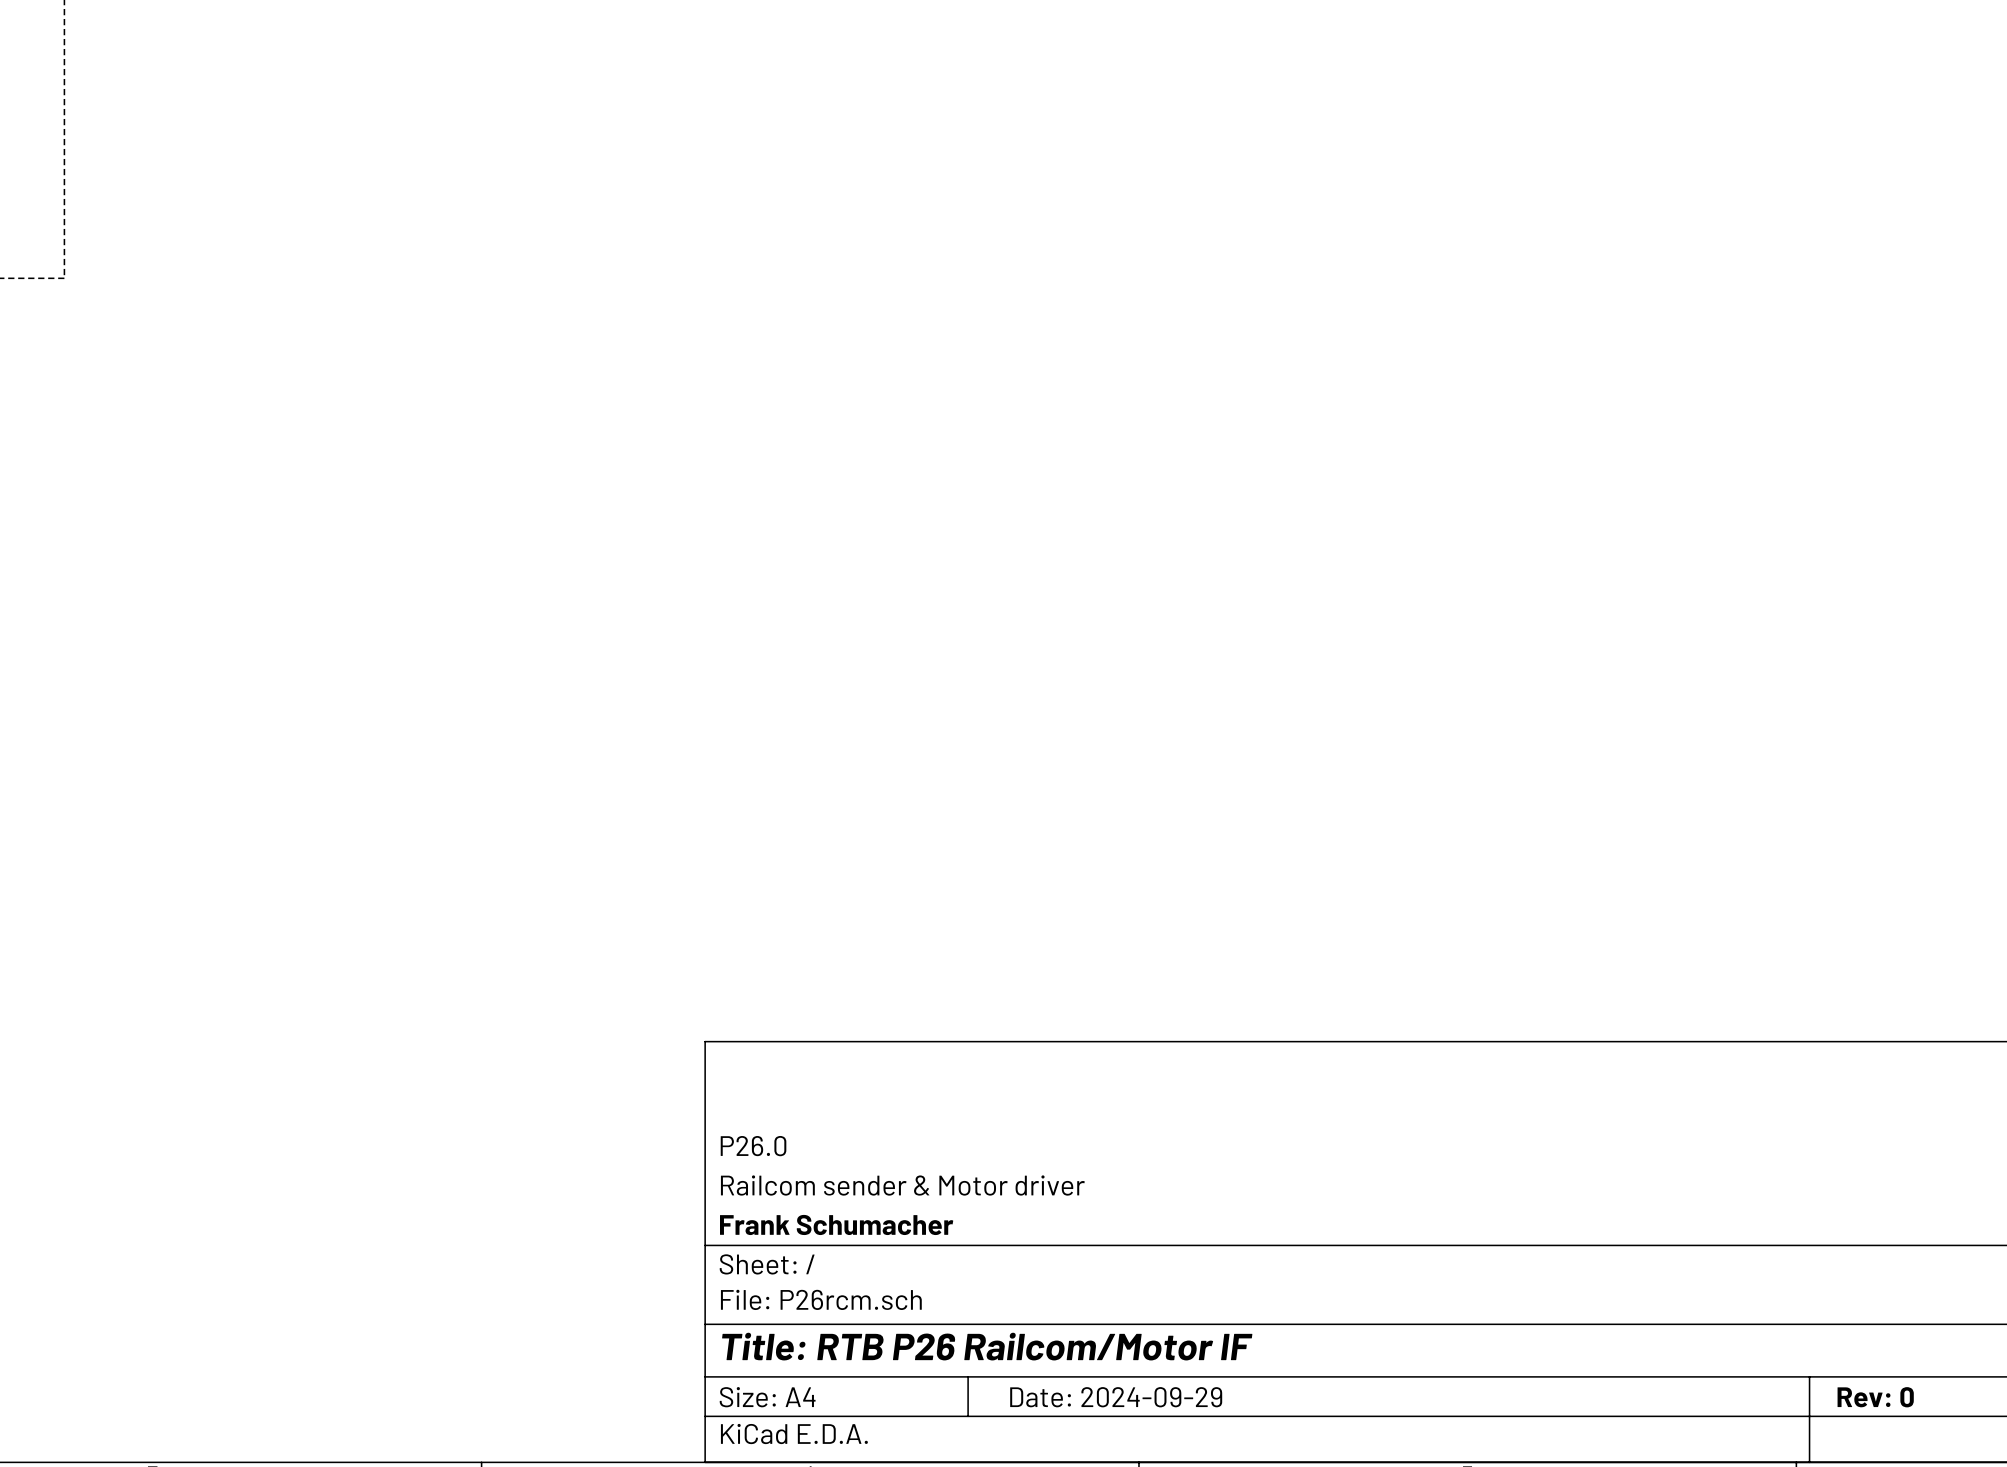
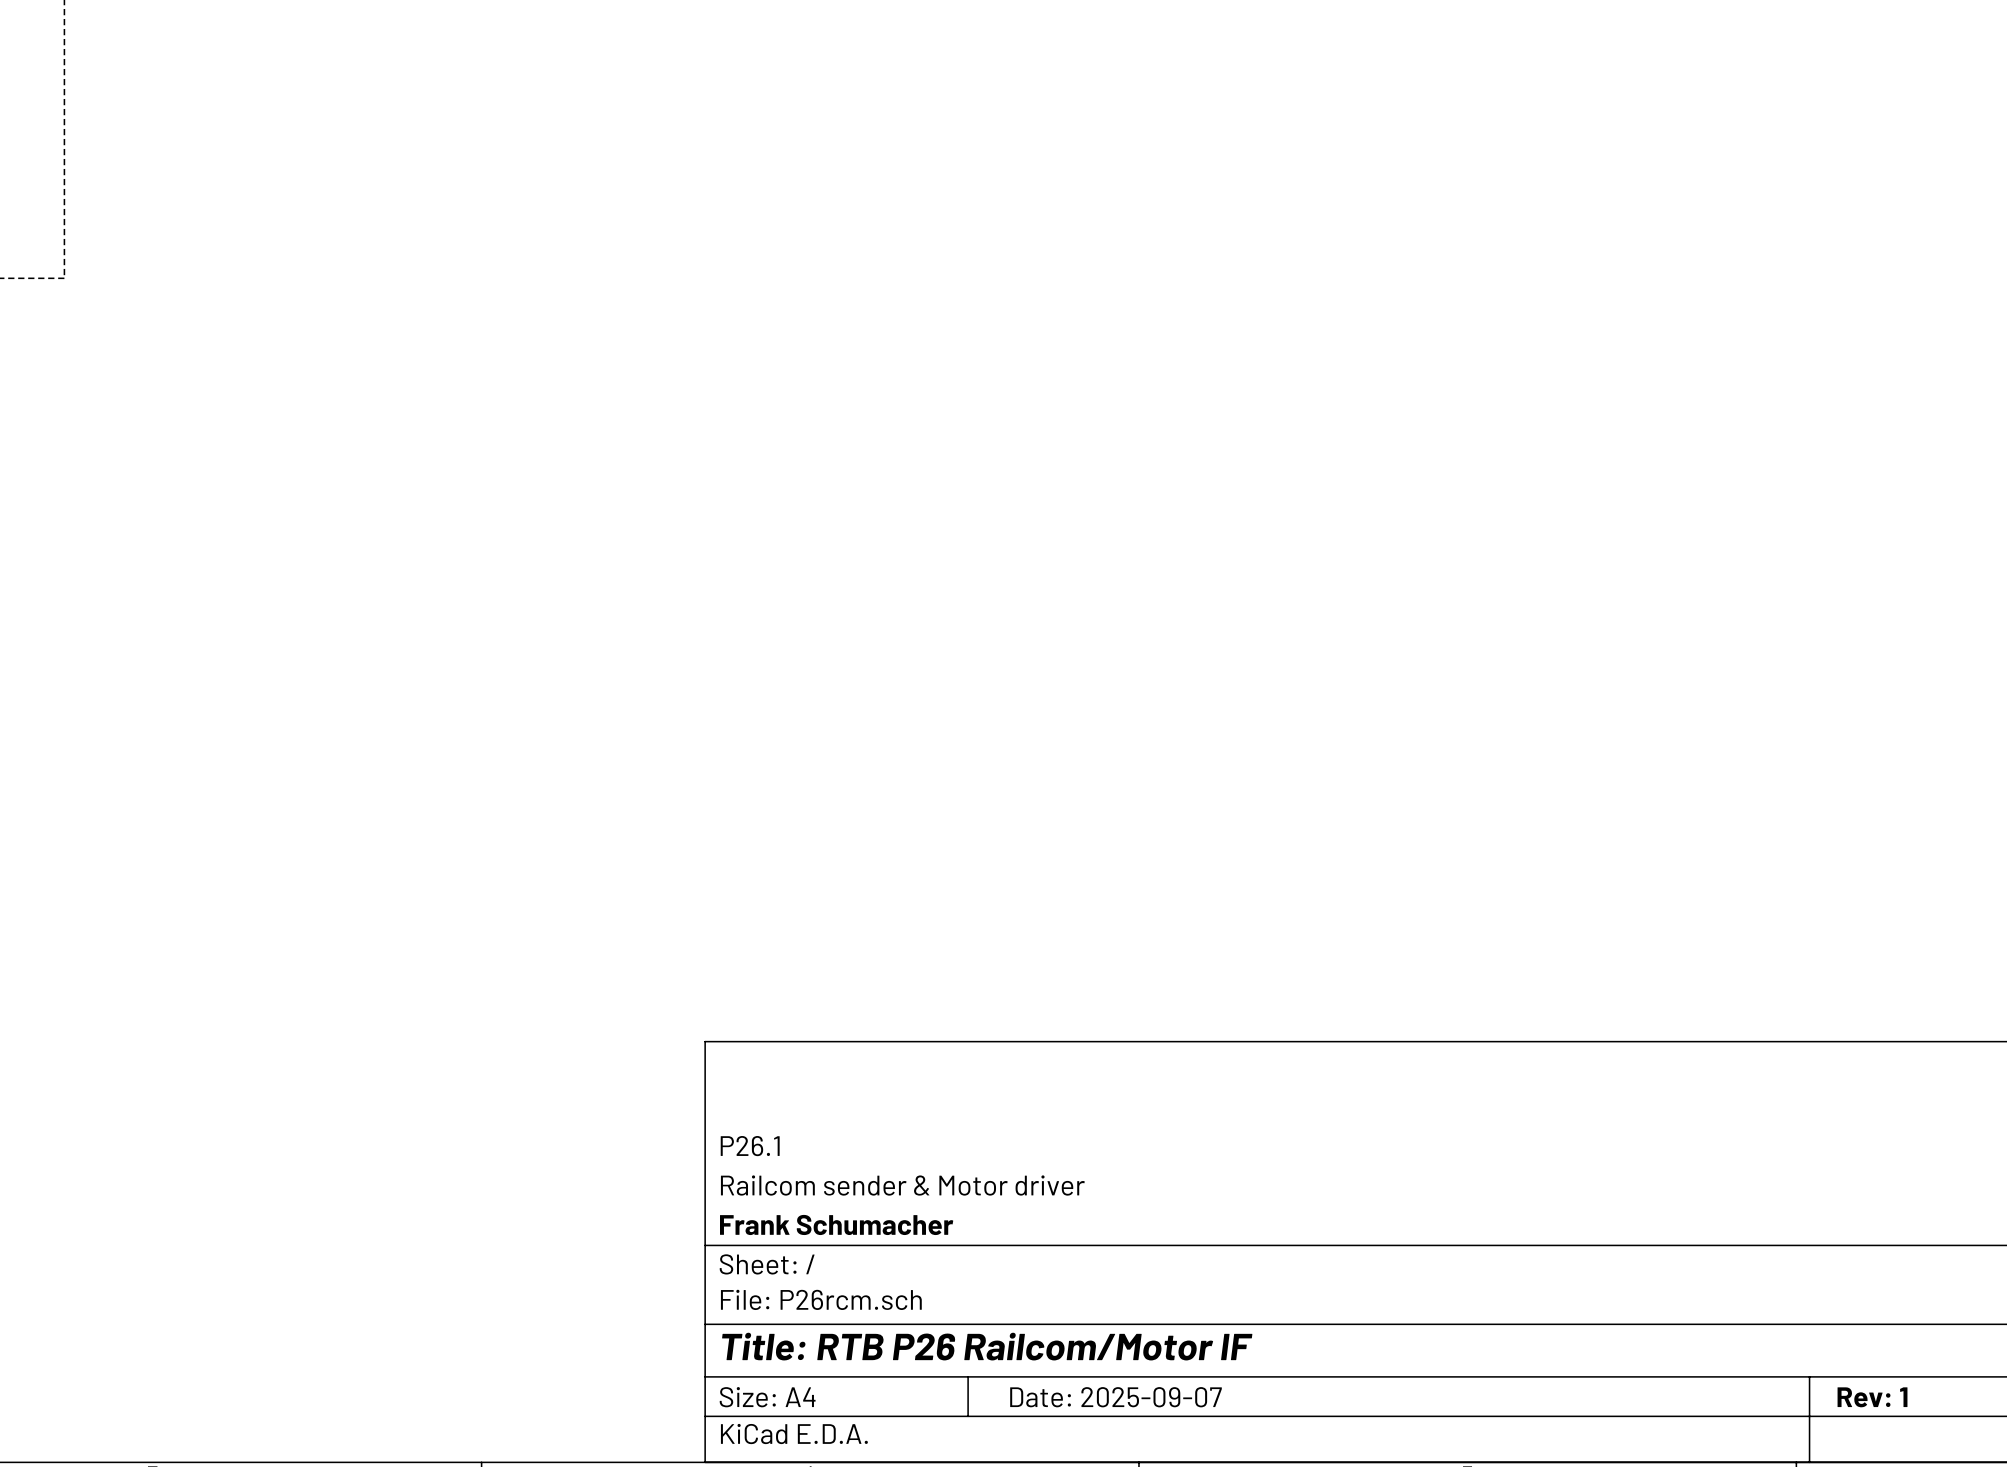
title block: P26.0 (753, 1146) -> P26.1 (750, 1146)
title block: Date: 2024-09-29 (1116, 1397) -> Date: 2025-09-07 (1116, 1397)
title block: Rev: 0 (1875, 1397) -> Rev: 1 (1872, 1397)

